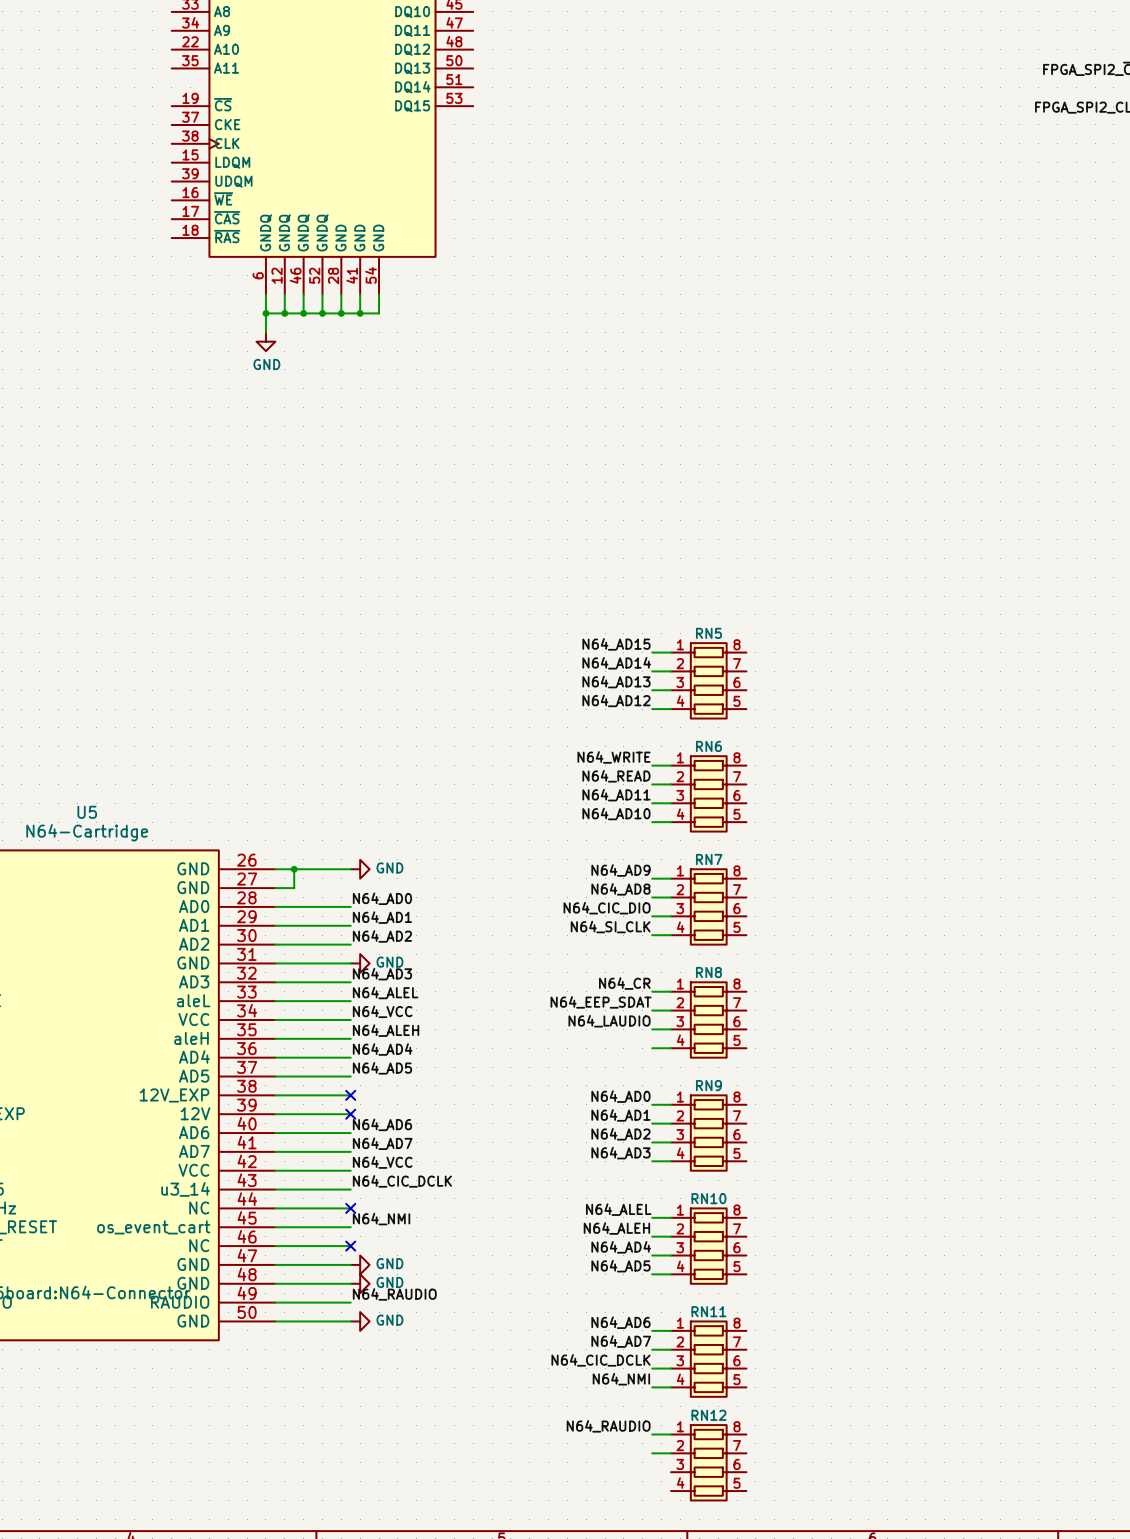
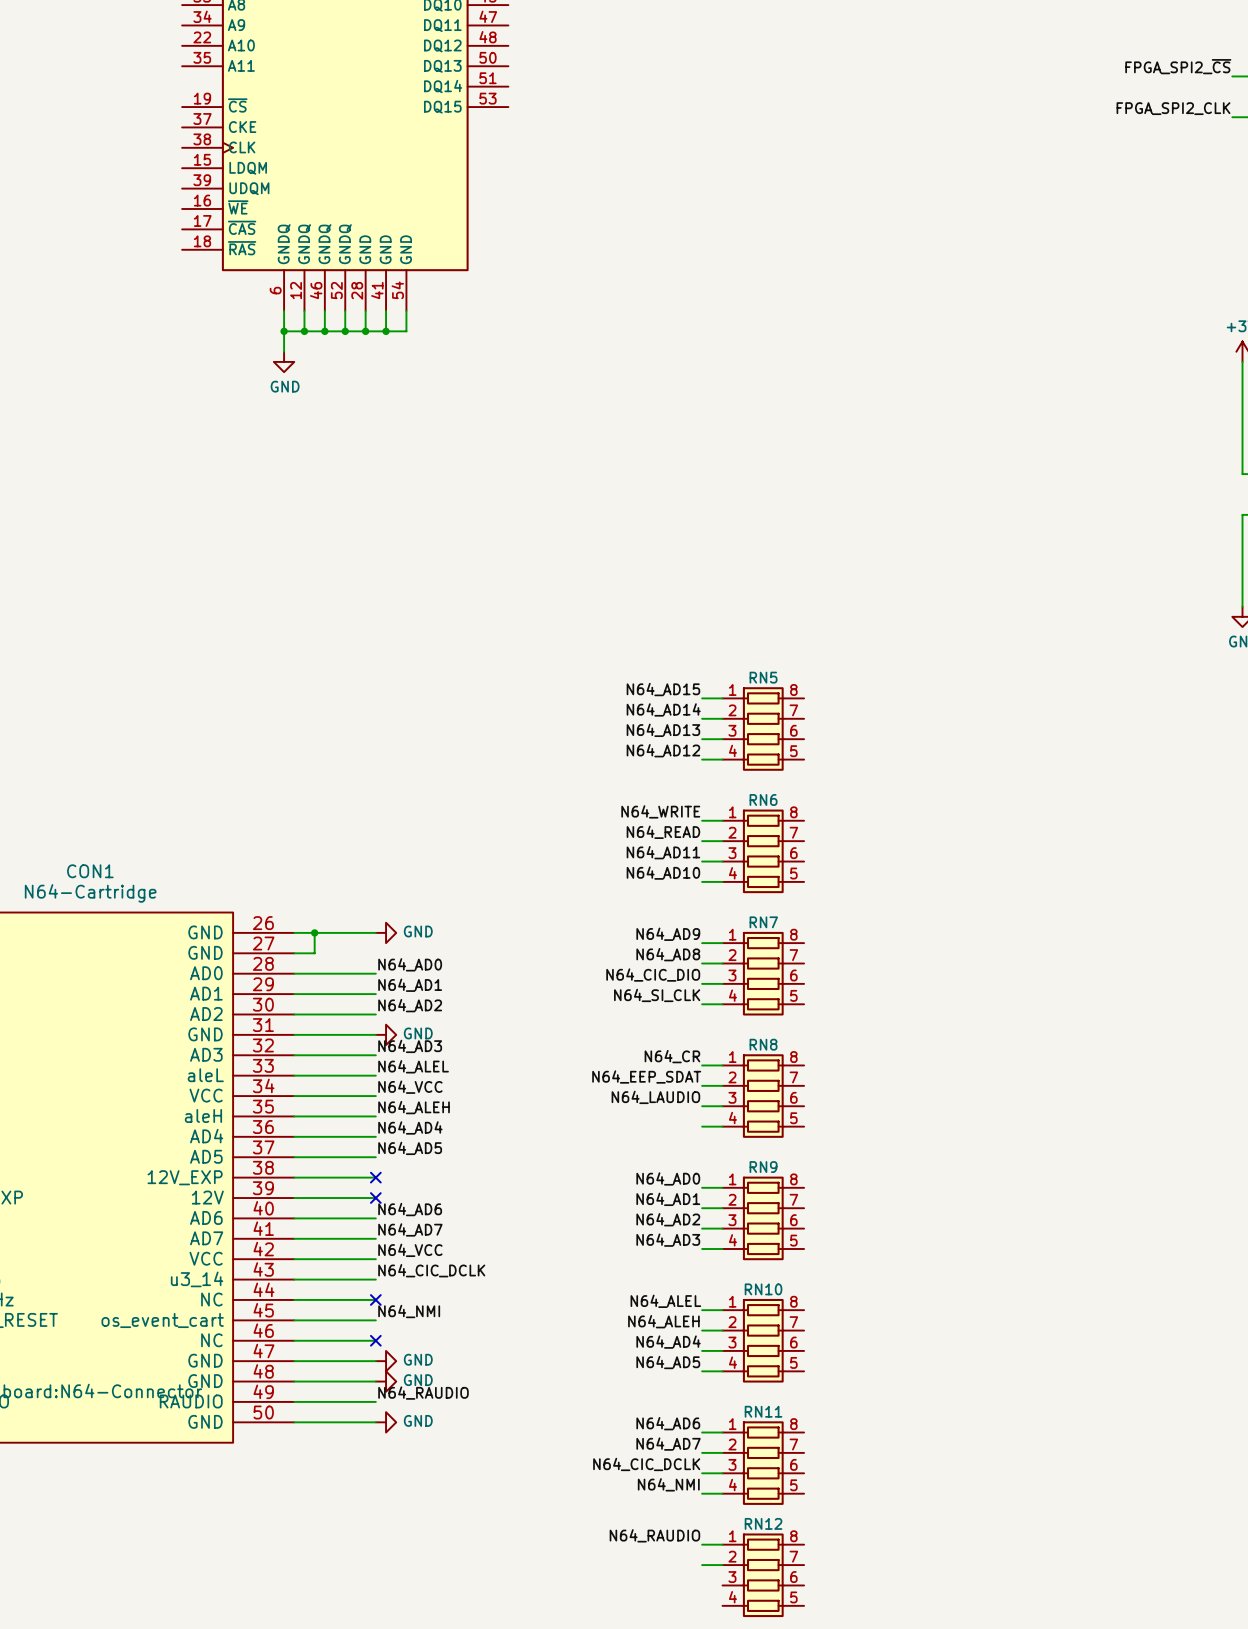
U5 name: U5 (87, 812) -> CON1 (90, 871)

